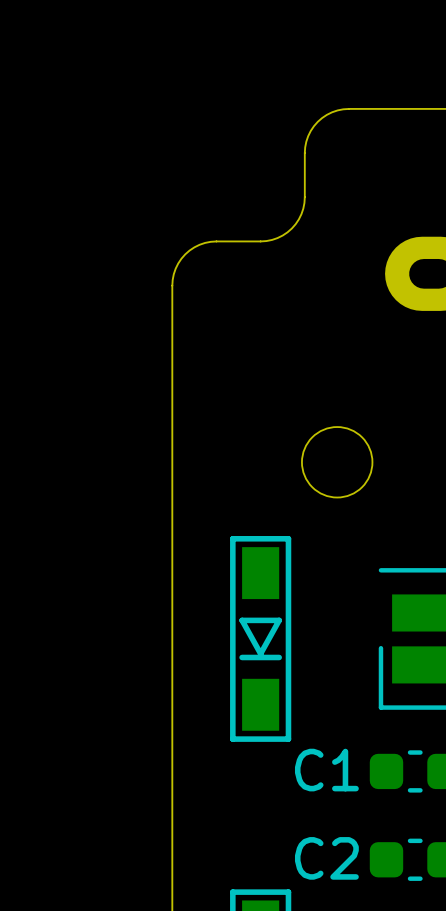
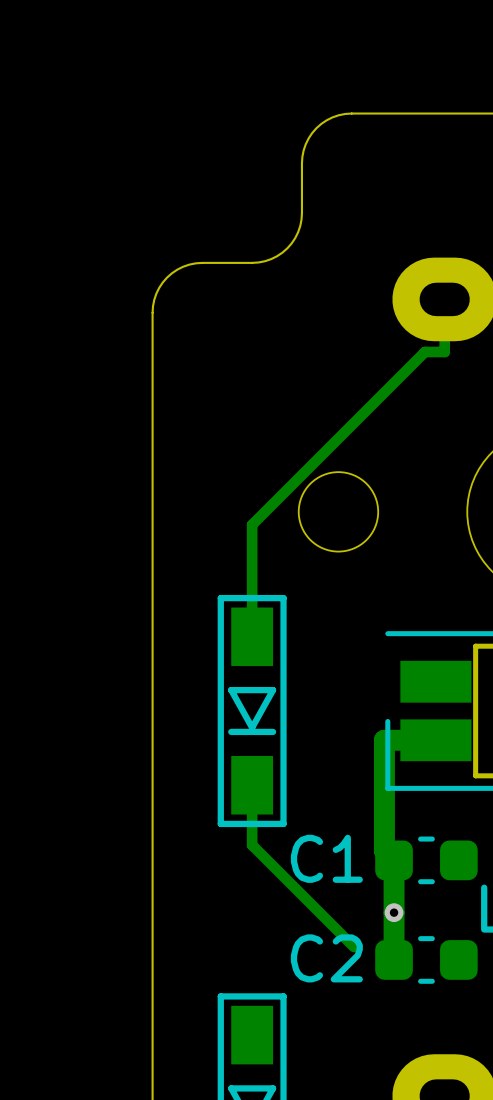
track: none -> (444, 299) (444, 351) (424, 351) (252, 524) (252, 636)
track: none -> (435, 740) (384, 740) (384, 850) (394, 860) (394, 959)
track: none -> (252, 785) (252, 845) (354, 946)
via: none -> (394, 912)

